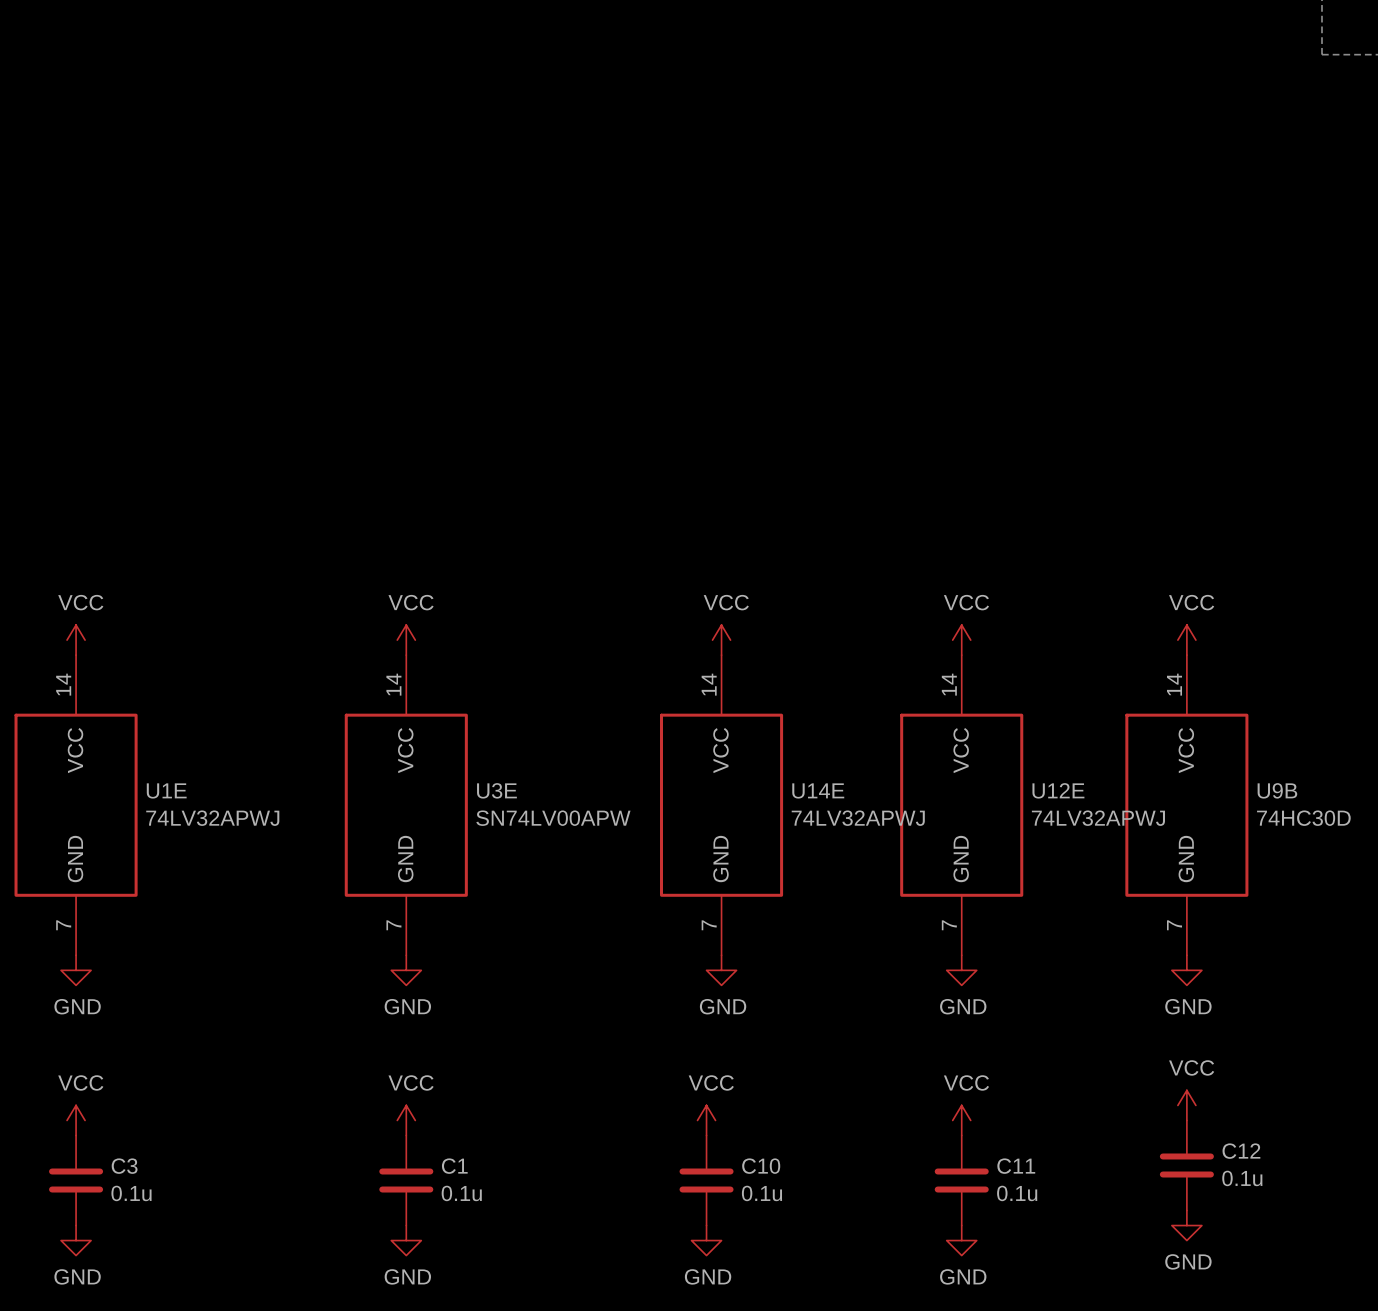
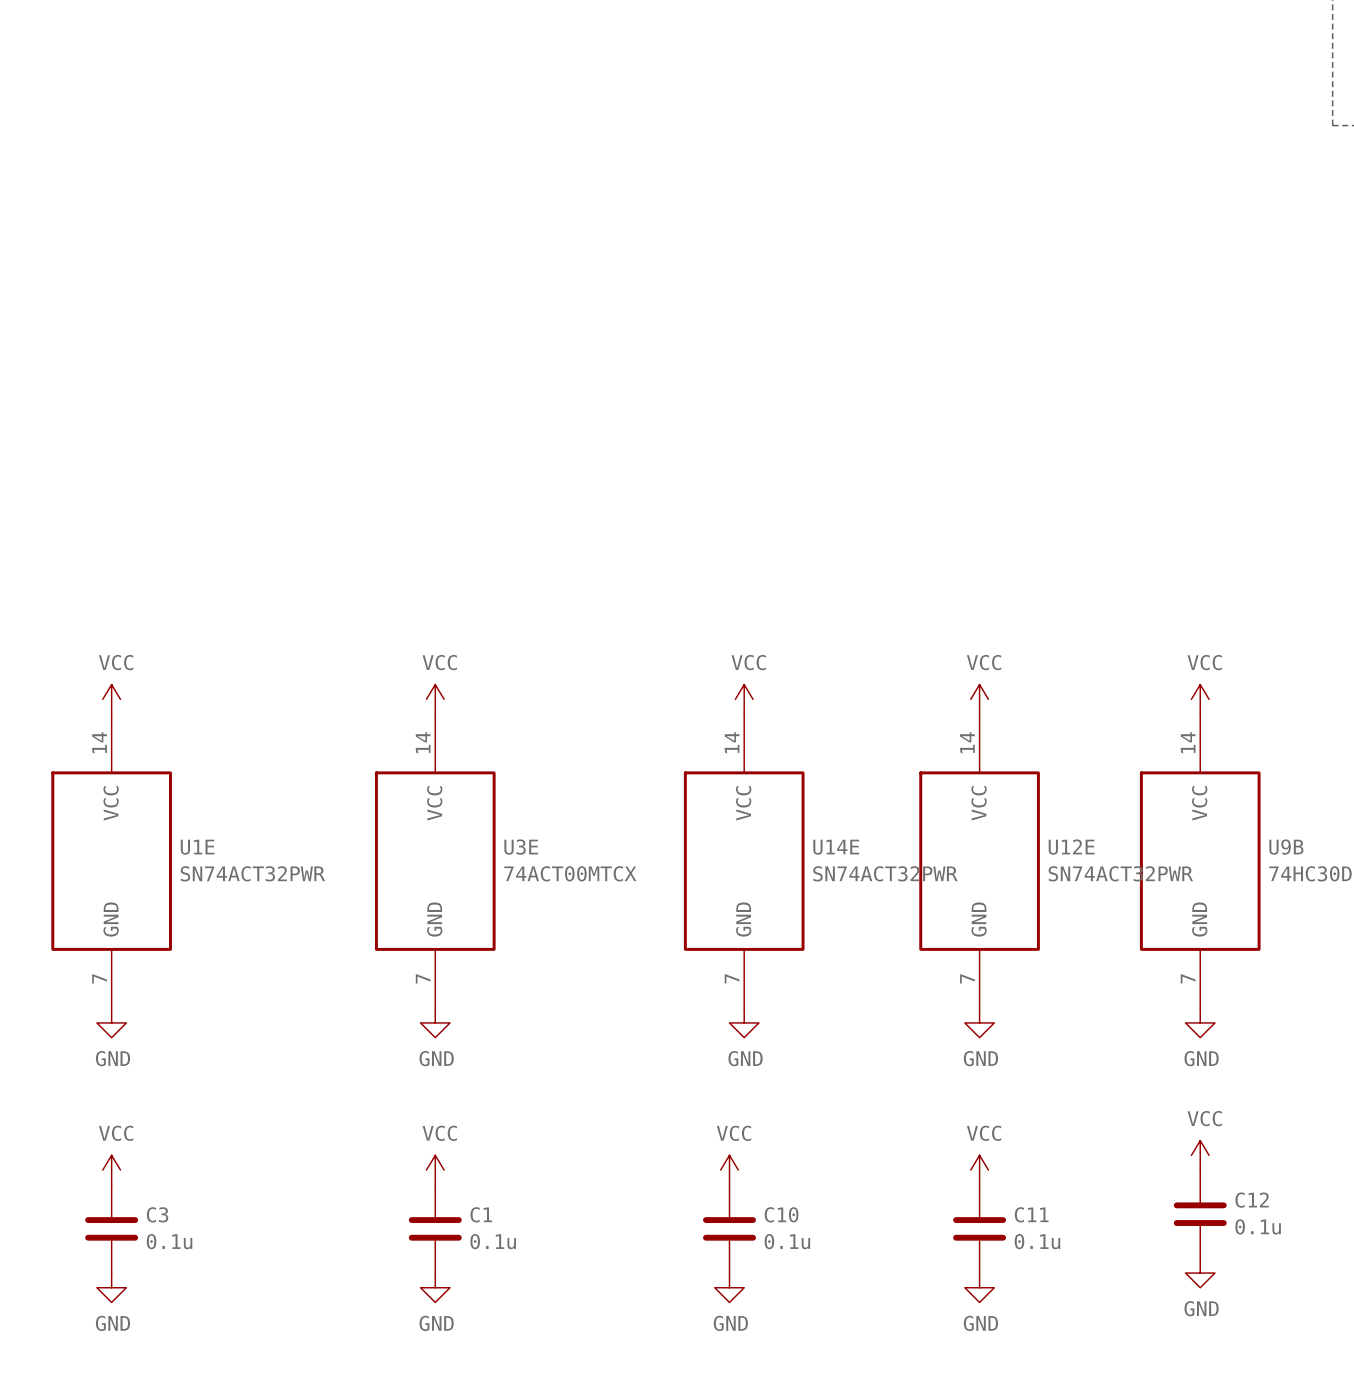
U1E value: 74LV32APWJ (212, 818) -> SN74ACT32PWR (252, 873)
U3E value: SN74LV00APW (553, 818) -> 74ACT00MTCX (570, 873)
U14E value: 74LV32APWJ (858, 818) -> SN74ACT32PWR (885, 873)
U12E value: 74LV32APWJ (1098, 818) -> SN74ACT32PWR (1120, 873)

